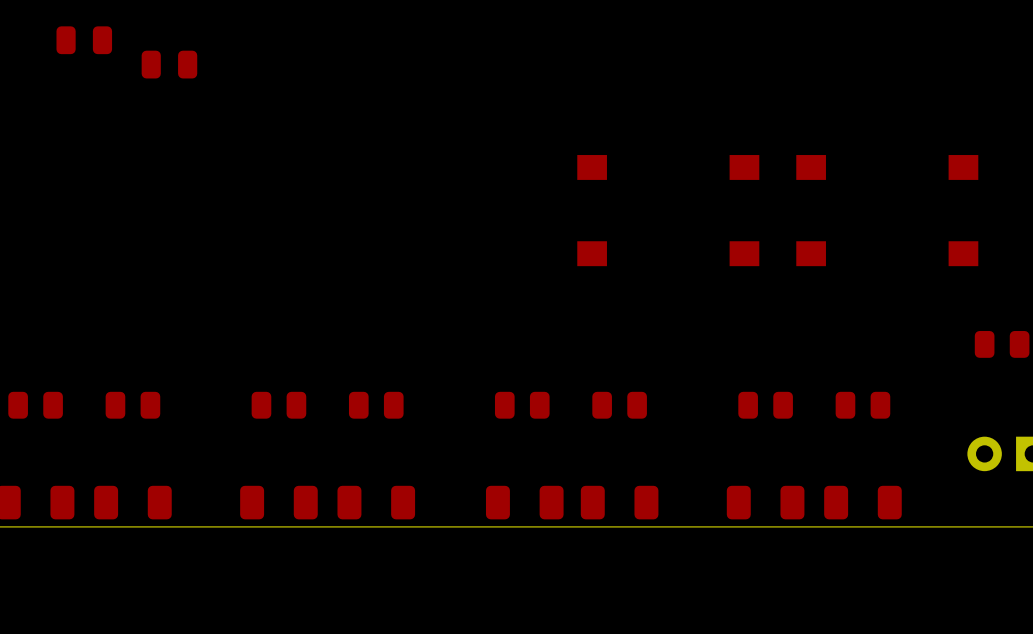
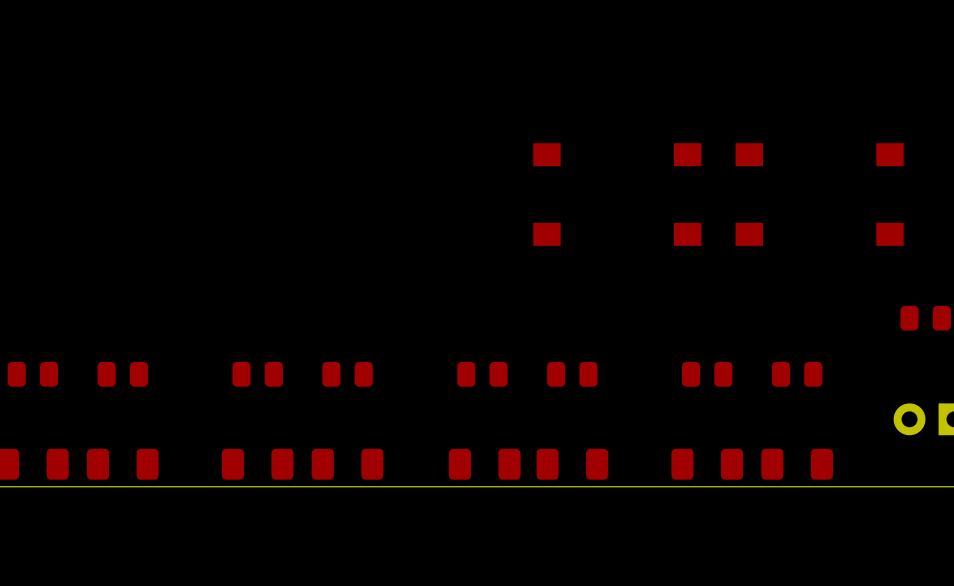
part: (84, 40) -> none
part: (169, 64) -> none

